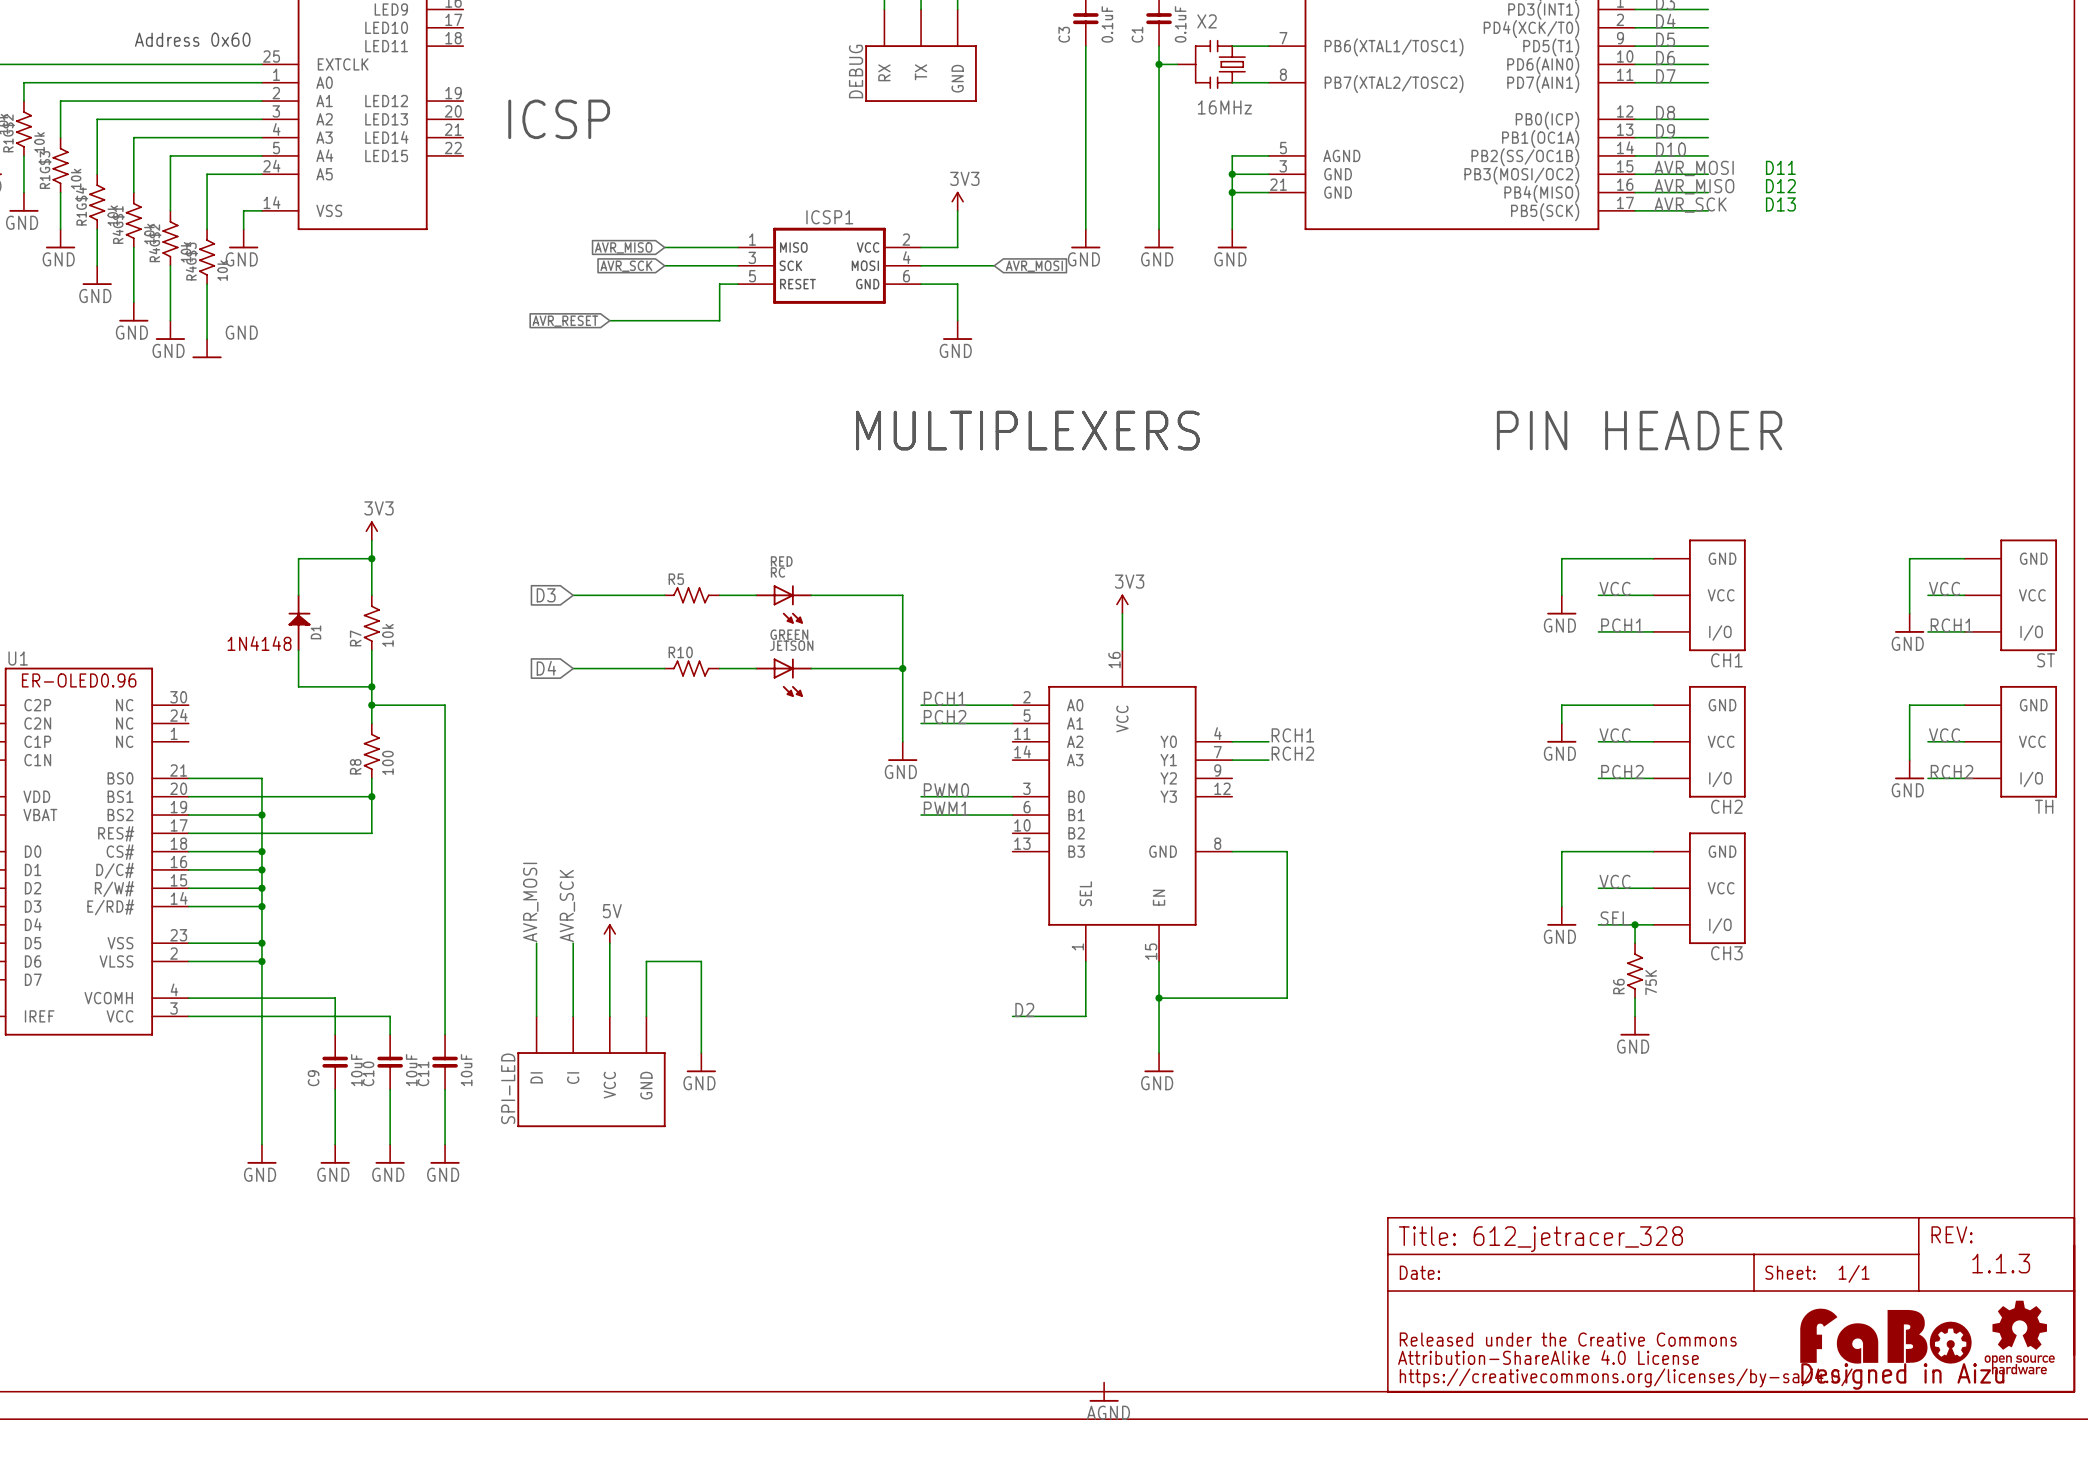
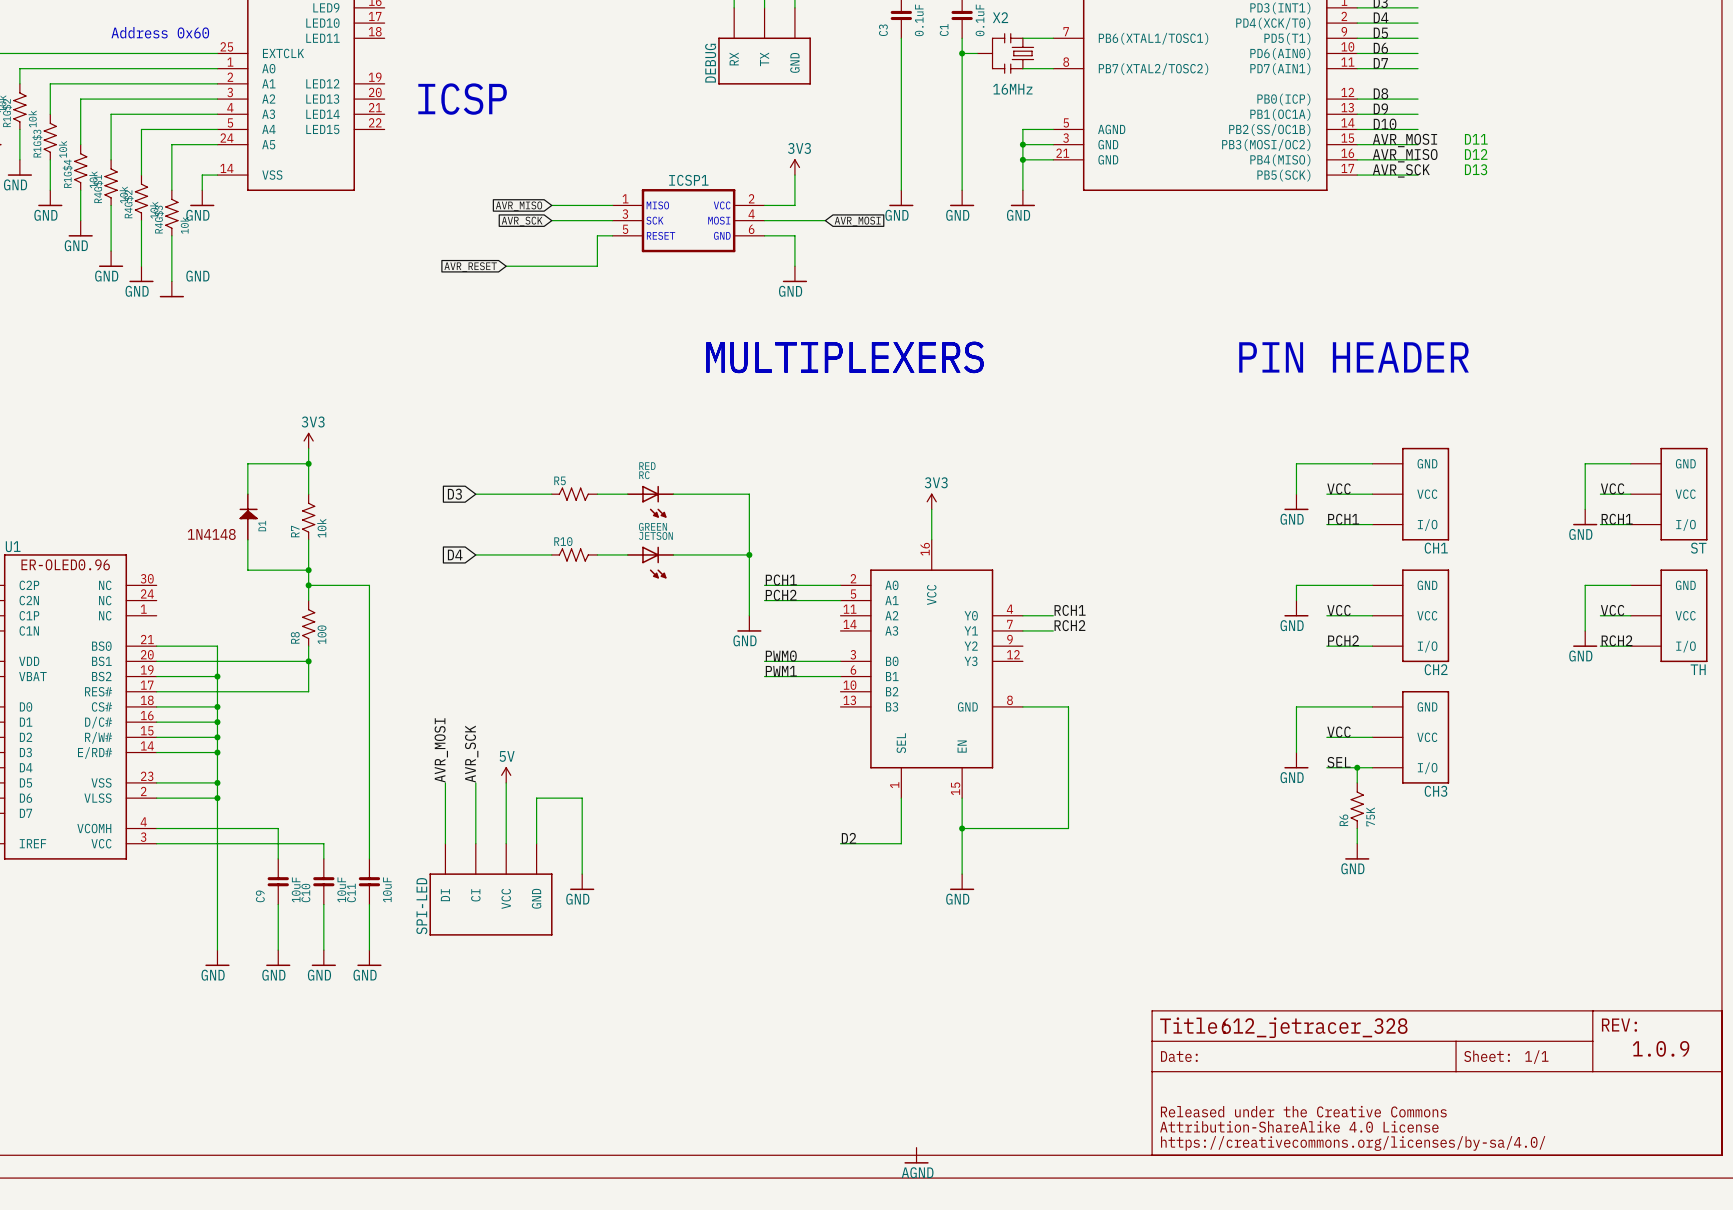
text: 1.1.3 (2001, 1263) -> 1.0.9 (1661, 1048)
part: (1885, 1336) -> none
part: (2019, 1337) -> none

